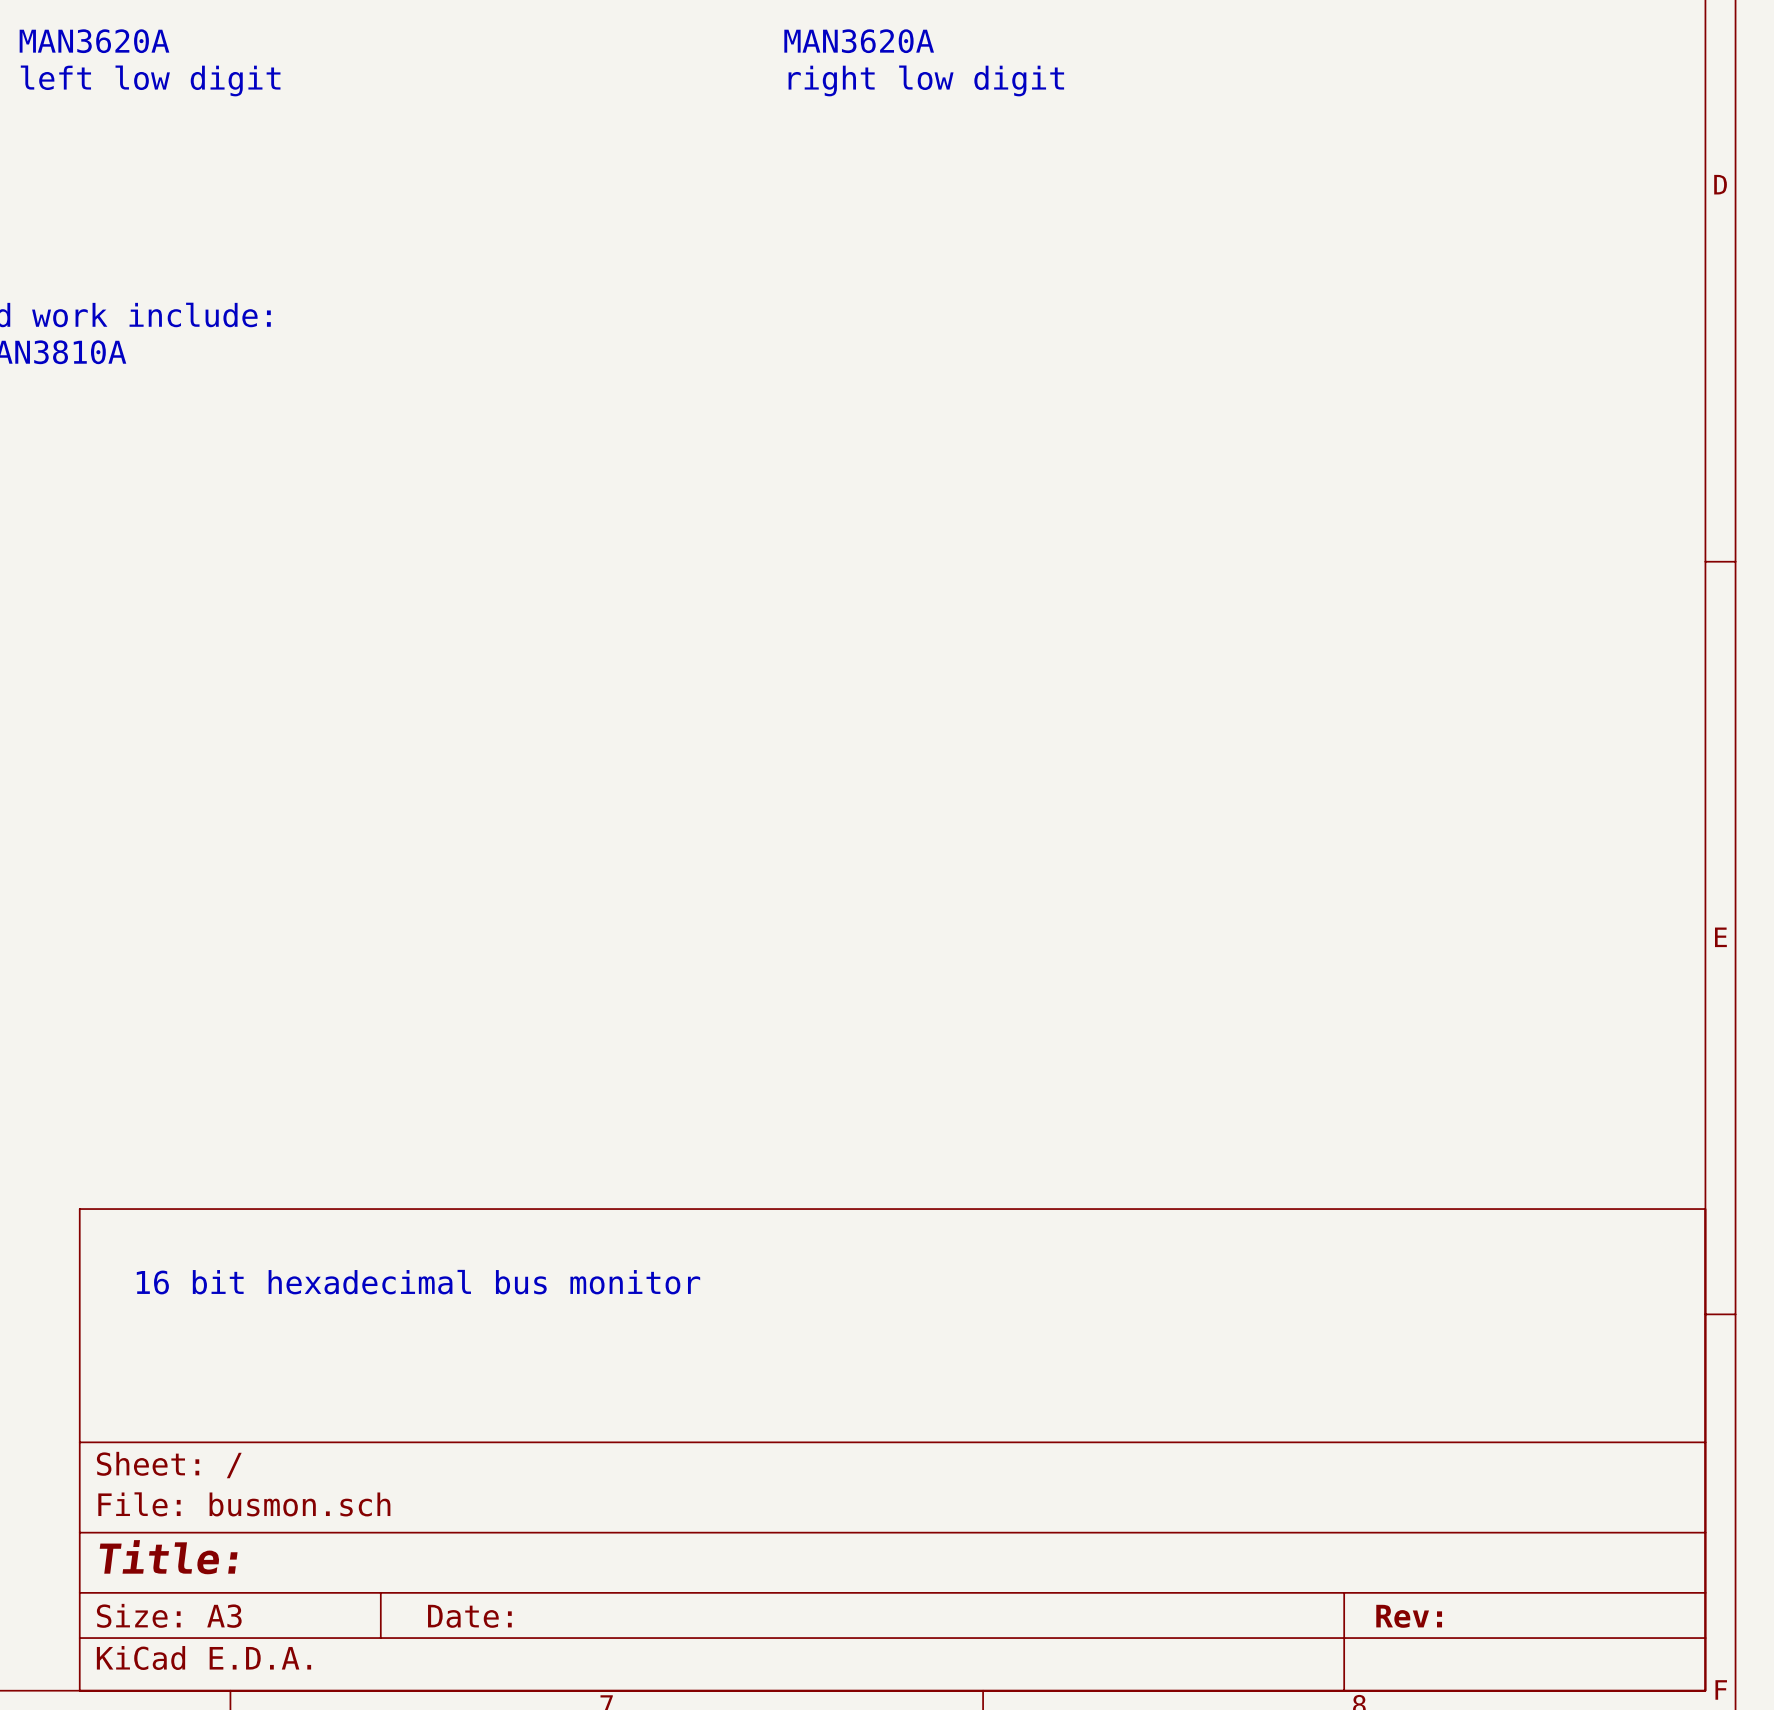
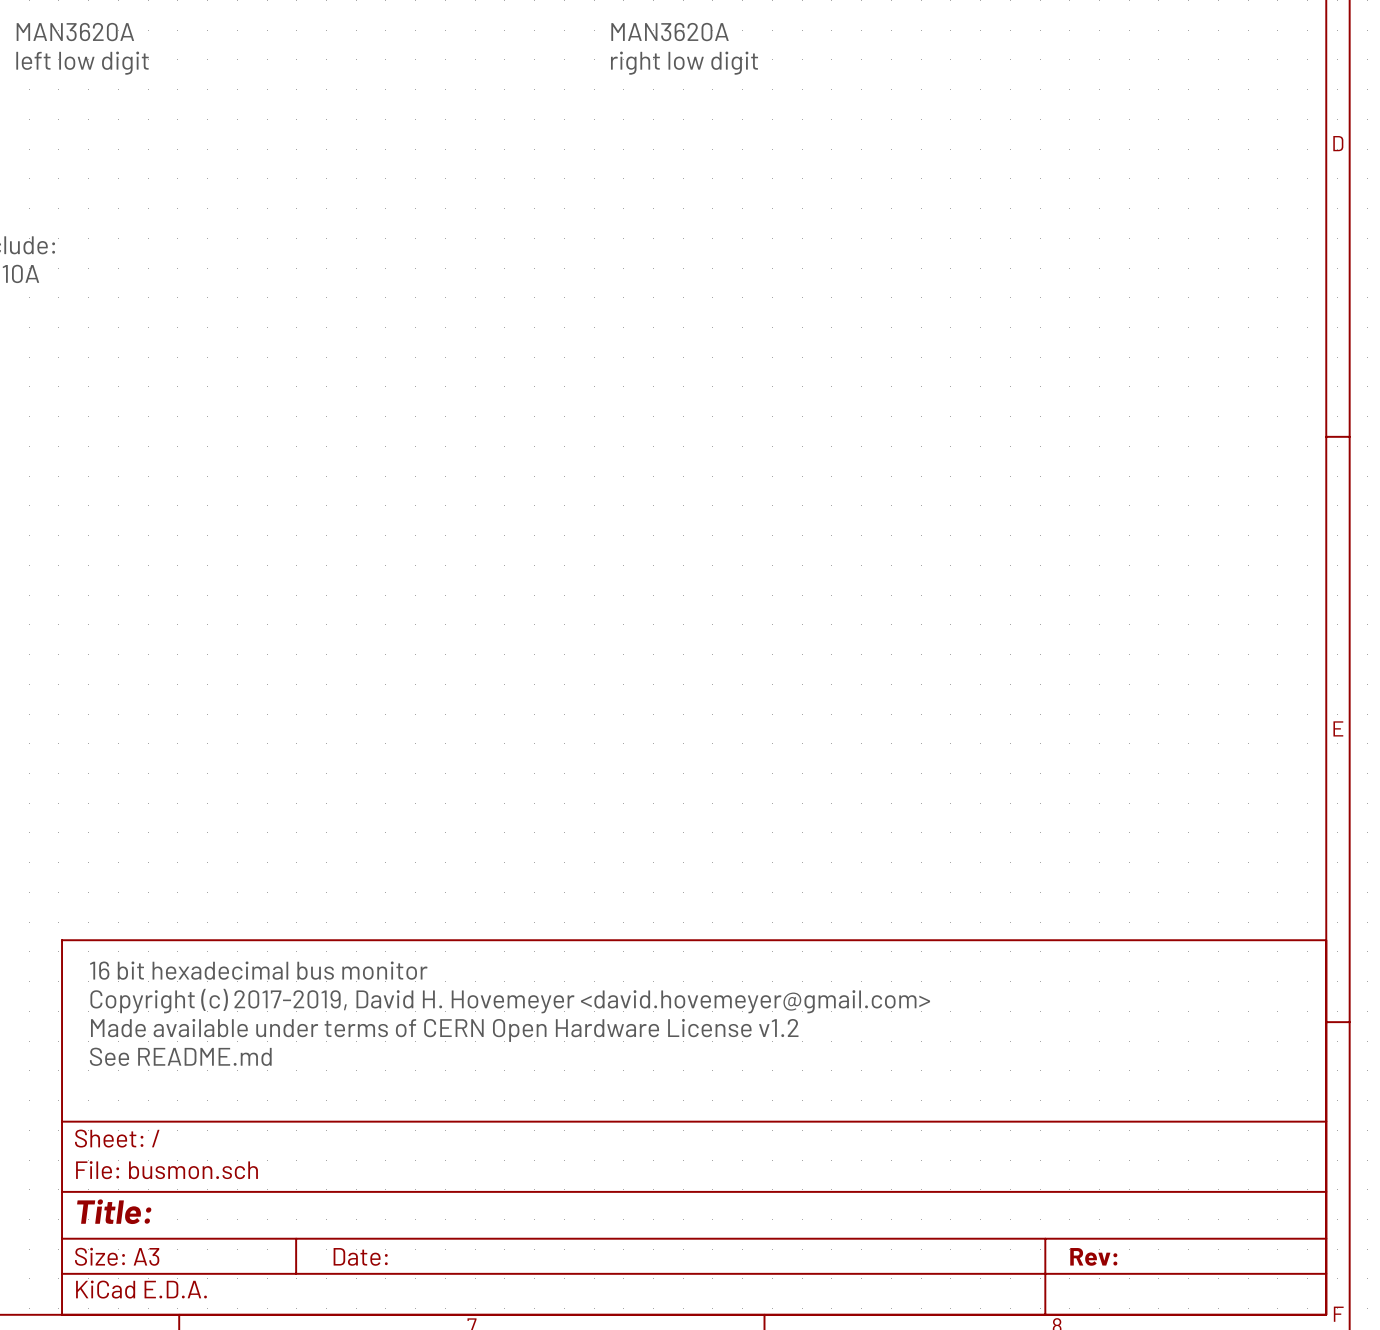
text position: 16 bit hexadecimal bus monitor (418, 1282) -> 16 bit hexadecimal bus monitor (258, 970)
text: none -> Copyright (c) 2017-2019, David H. Hovemeyer <david.hovemeyer@gmail.com> (510, 1001)
text: none -> Made available under terms of CERN Open Hardware License v1.2 (444, 1030)
text: none -> See README.md (180, 1056)

